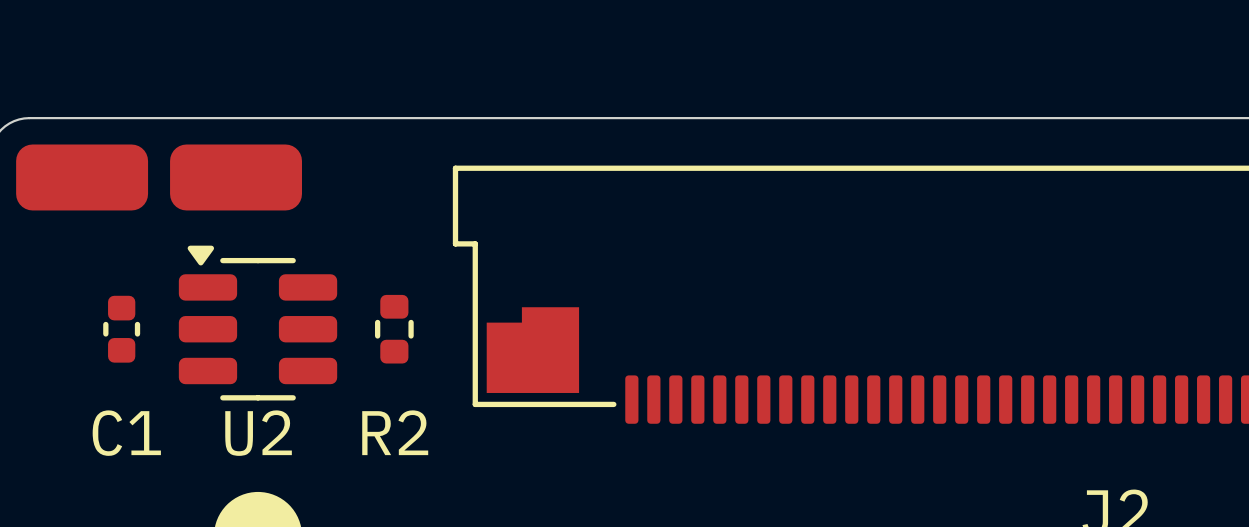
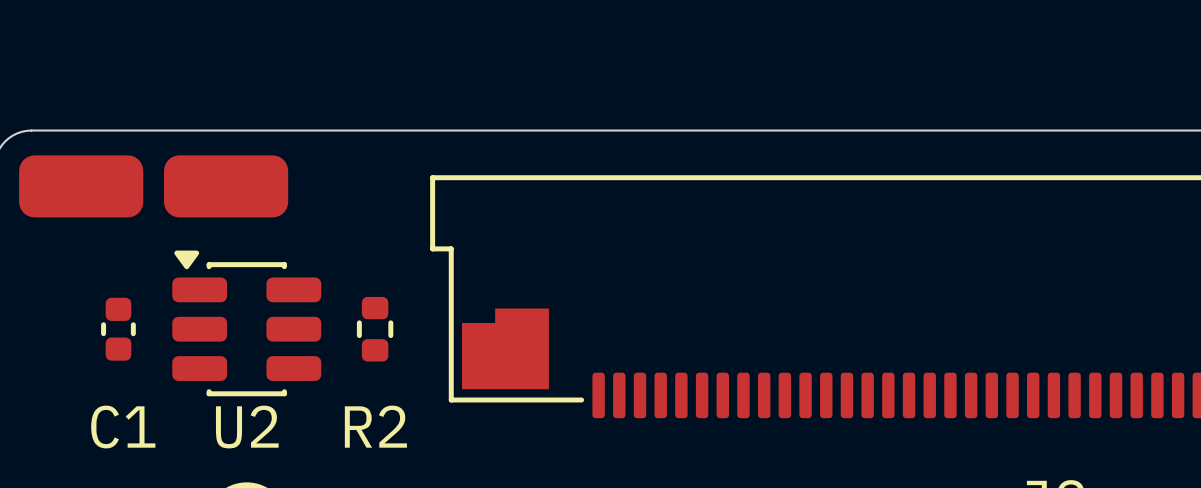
U2 footprint: [178, 245, 338, 401] -> [172, 250, 322, 397]

